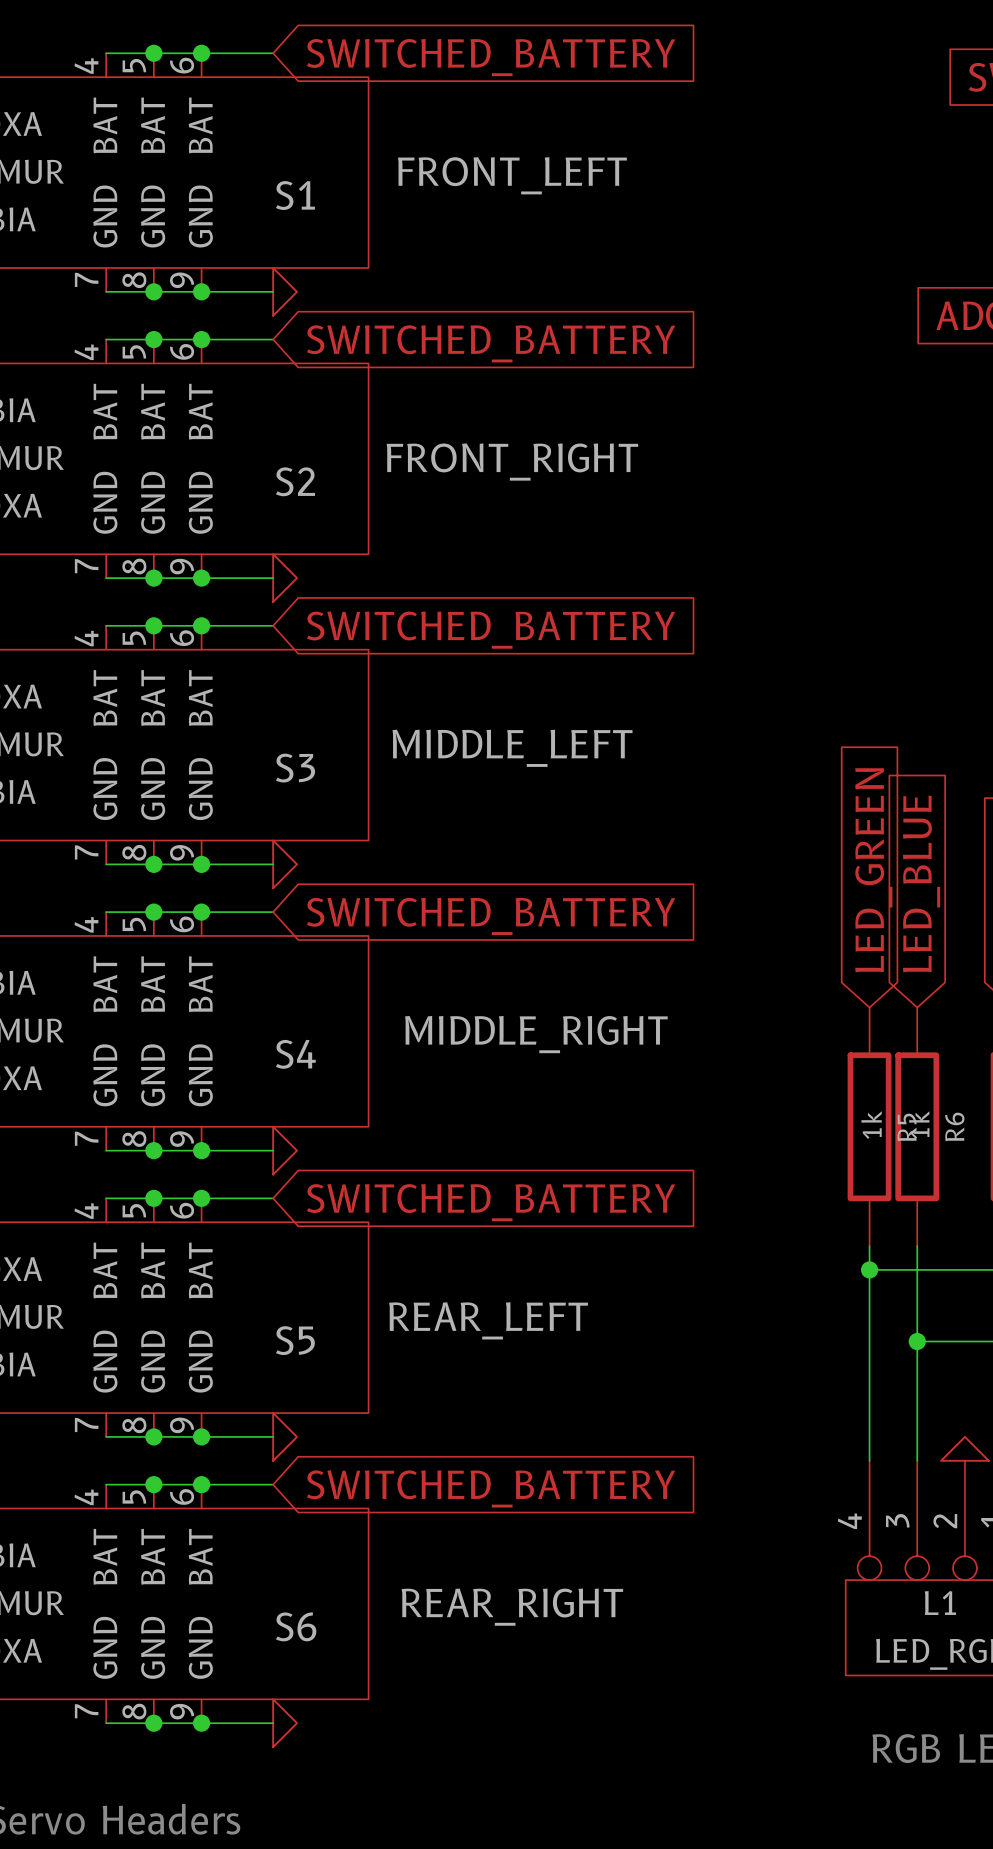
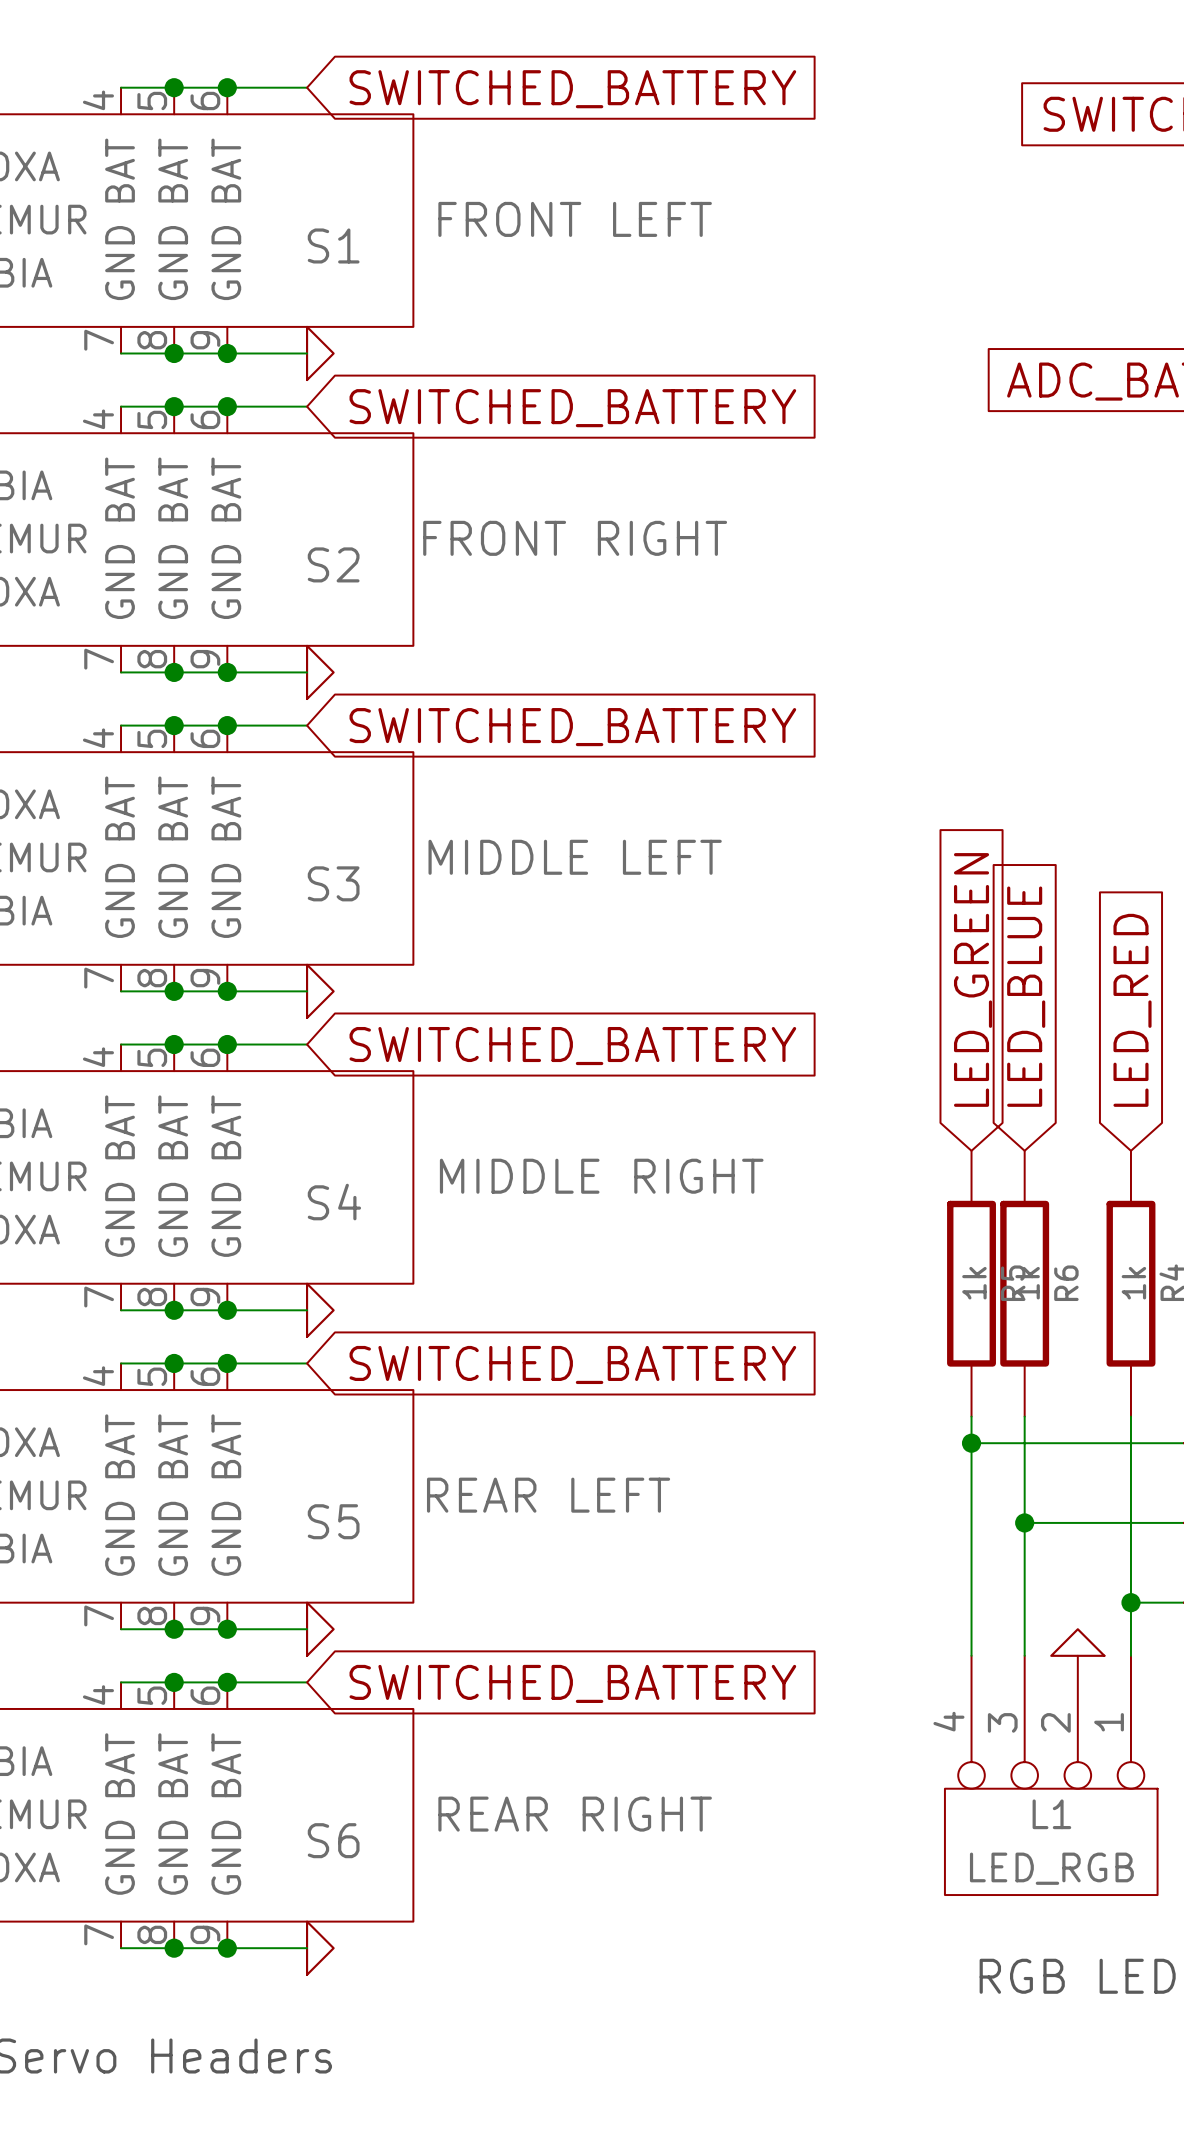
S1 value: FRONT_LEFT (512, 175) -> FRONT LEFT (575, 219)
S2 value: FRONT_RIGHT (512, 462) -> FRONT RIGHT (575, 538)
S3 value: MIDDLE_LEFT (512, 748) -> MIDDLE LEFT (575, 857)
S4 value: MIDDLE_RIGHT (536, 1034) -> MIDDLE RIGHT (601, 1176)
S5 value: REAR_LEFT (488, 1320) -> REAR LEFT (548, 1495)
S6 value: REAR_RIGHT (512, 1607) -> REAR RIGHT (575, 1814)

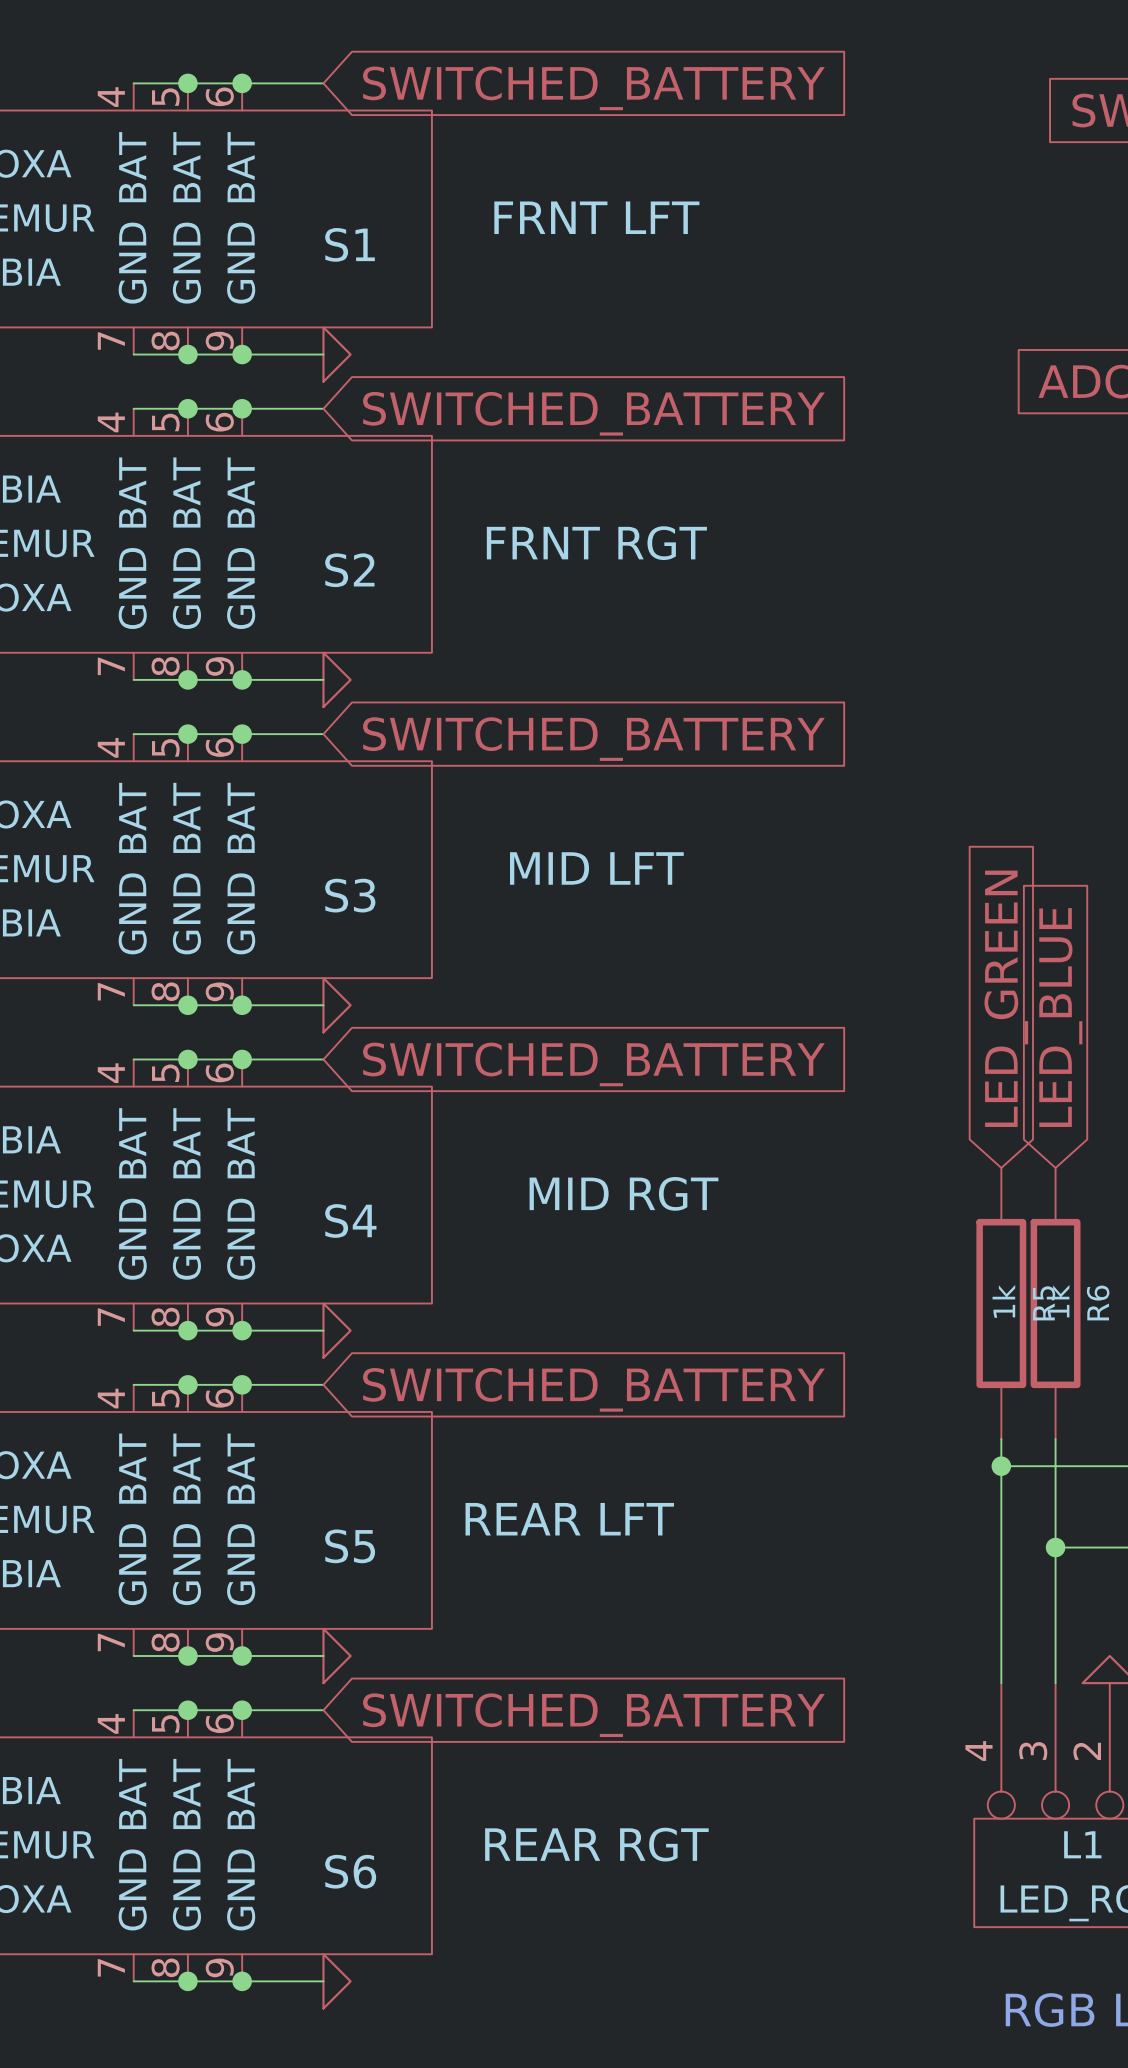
S1 value: FRONT LEFT (575, 219) -> FRNT LFT (596, 217)
S2 value: FRONT RIGHT (575, 538) -> FRNT RGT (596, 543)
S3 value: MIDDLE LEFT (575, 857) -> MID LFT (596, 868)
S4 value: MIDDLE RIGHT (601, 1176) -> MID RGT (624, 1193)
S5 value: REAR LEFT (548, 1495) -> REAR LFT (569, 1519)
S6 value: REAR RIGHT (575, 1814) -> REAR RGT (596, 1844)

